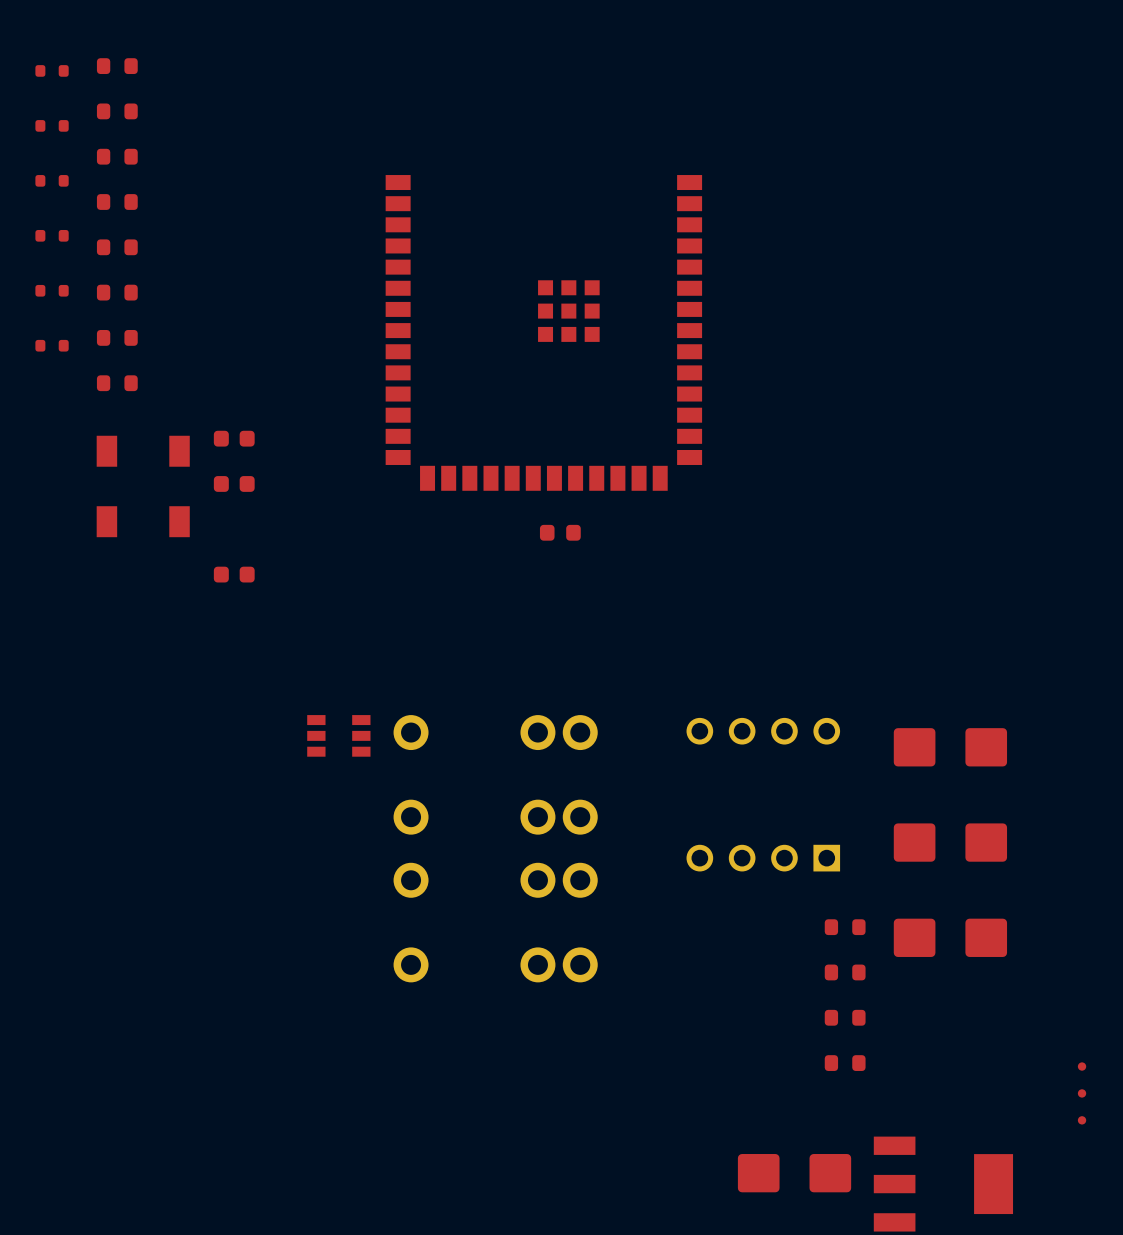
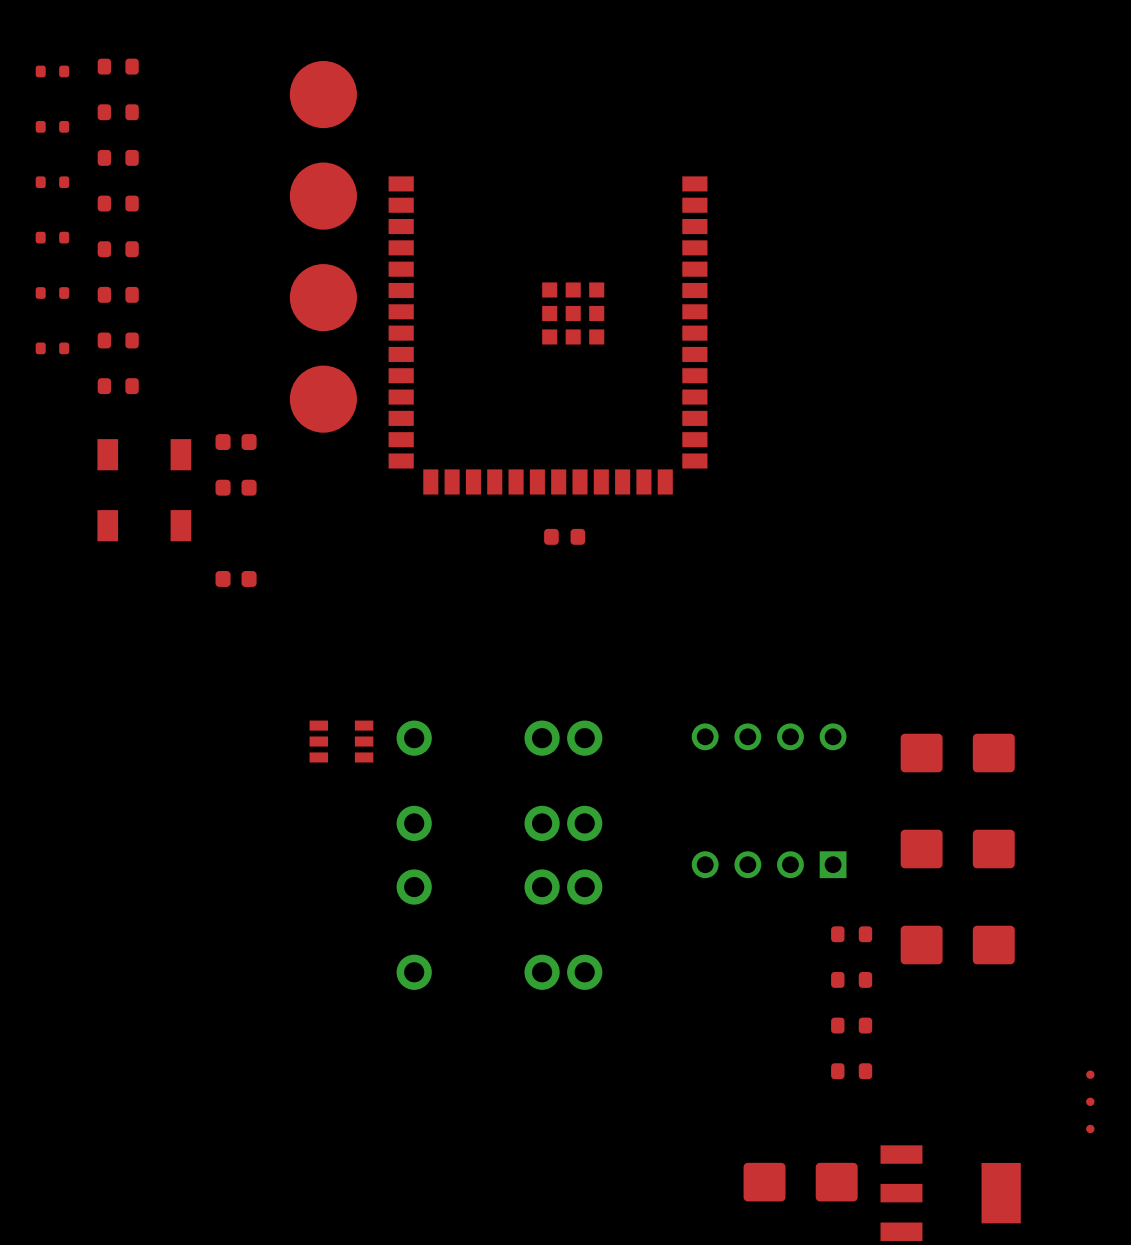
part: none -> (323, 94)
part: none -> (323, 196)
part: none -> (323, 297)
part: none -> (323, 399)

